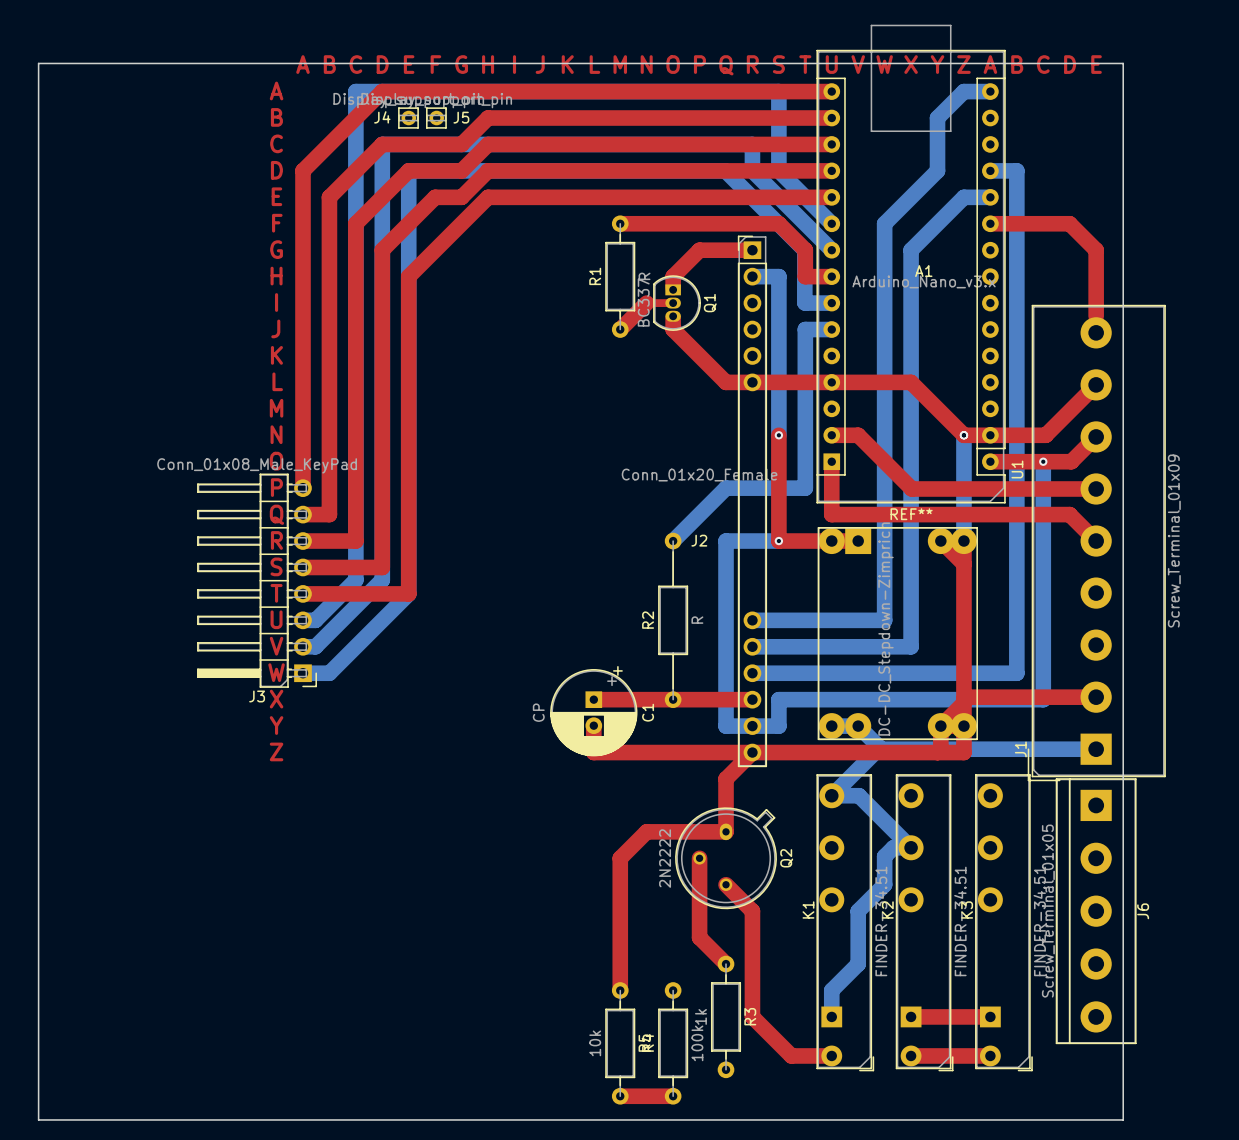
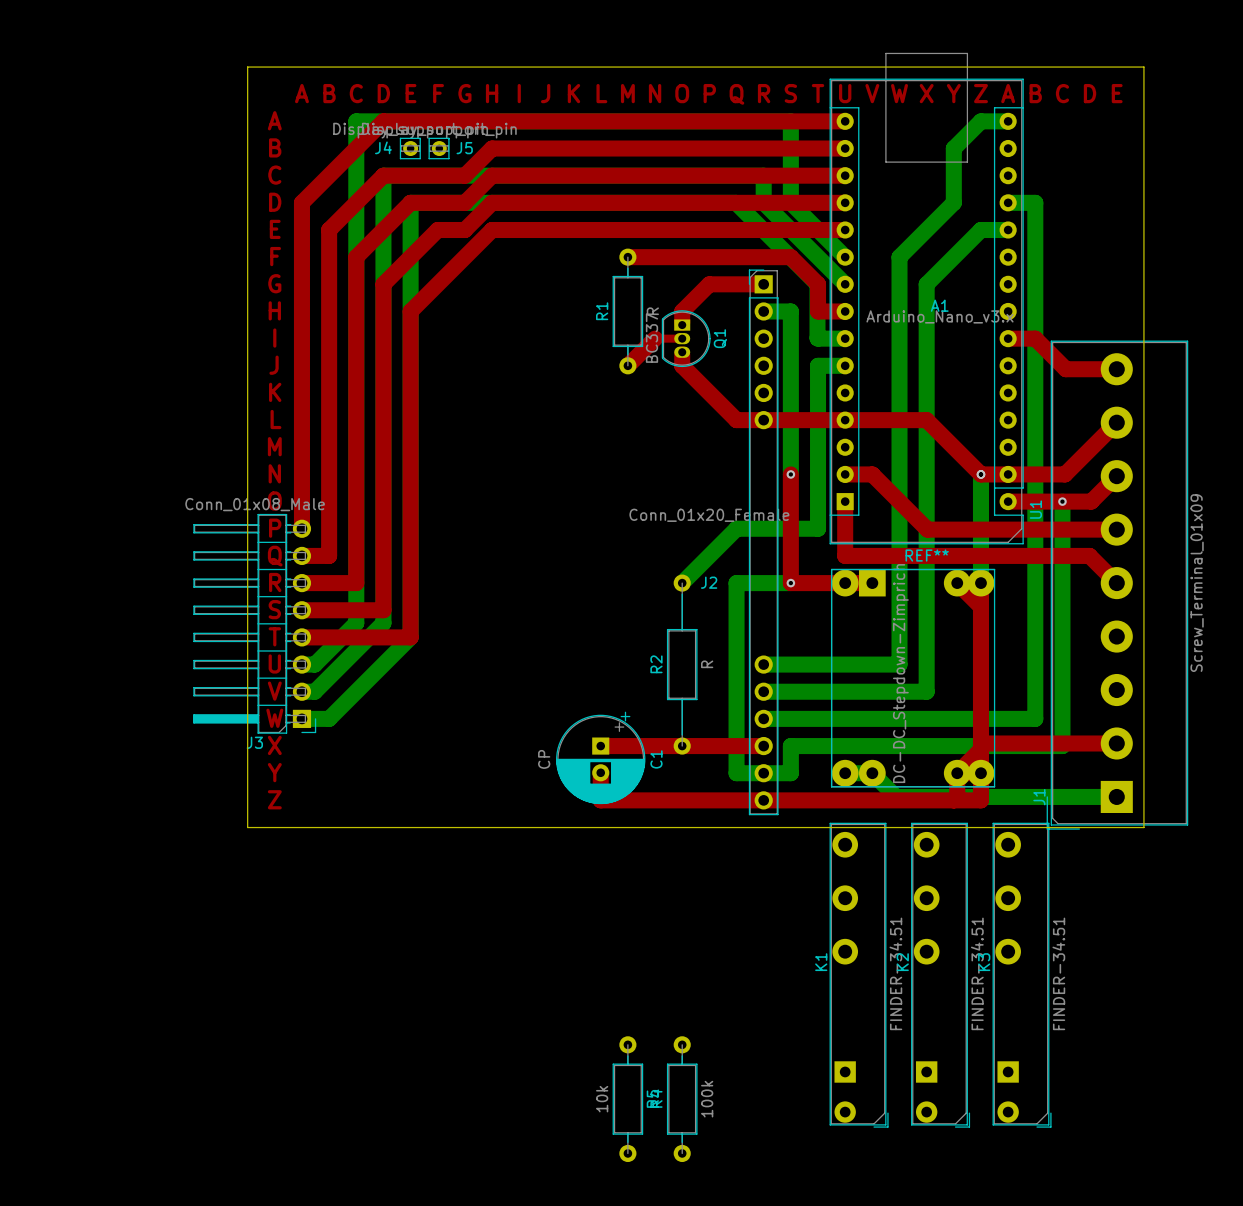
board edge: (38, 63) (38, 1119) (1123, 1119) (1123, 63) (38, 63) -> (247, 67) (247, 827) (1143, 827) (1143, 67) (247, 67)
top track: (990, 223) (1069, 223) (1096, 250) (1096, 316) -> none
top track: none -> (1008, 338) (1035, 338) (1065, 369) (1116, 369)
J3 value: Conn_01x08_Male_KeyPad (257, 465) -> Conn_01x08_Male (255, 504)
bottom track: (881, 749) (878, 749) (831, 795) (859, 795) (911, 847) (893, 847) (884, 856) (884, 884) (858, 911) (858, 964) (831, 990) (831, 1016) -> none
top track: (752, 752) (726, 778) (726, 831) (646, 831) (620, 858) (620, 990) -> none
top track: (699, 858) (699, 937) (726, 964) -> none
Q2: 2N2222 (726, 858) -> none
top track: (726, 884) (752, 911) (752, 1016) (791, 1055) (831, 1055) -> none
J6: Screw_Terminal_01x05 (1096, 911) -> none
R3: 1k (726, 1016) -> none
top track: (911, 1016) (990, 1016) -> none
top track: (911, 1055) (990, 1055) -> none
top track: (620, 1096) (673, 1096) -> none

